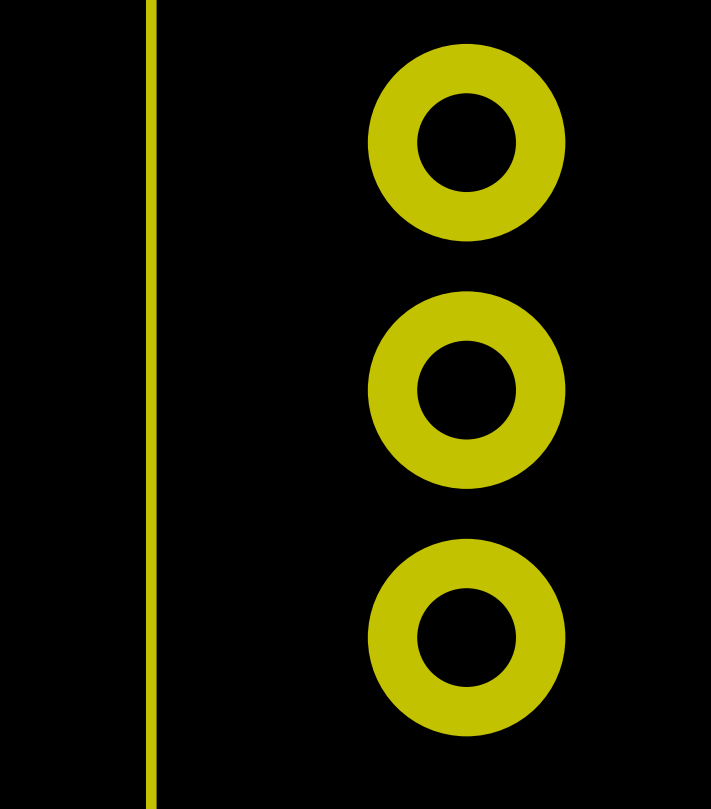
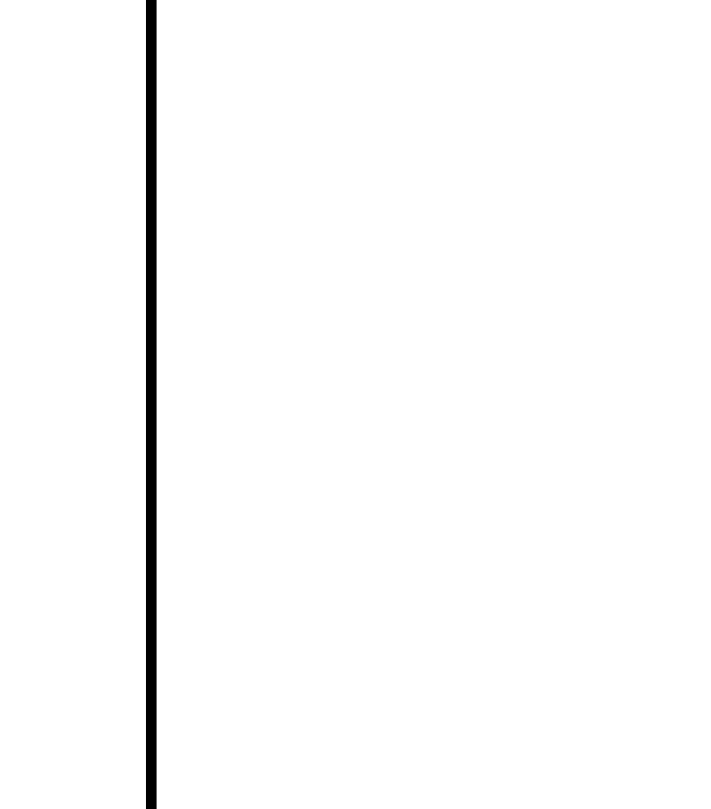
part: (466, 390) -> none

